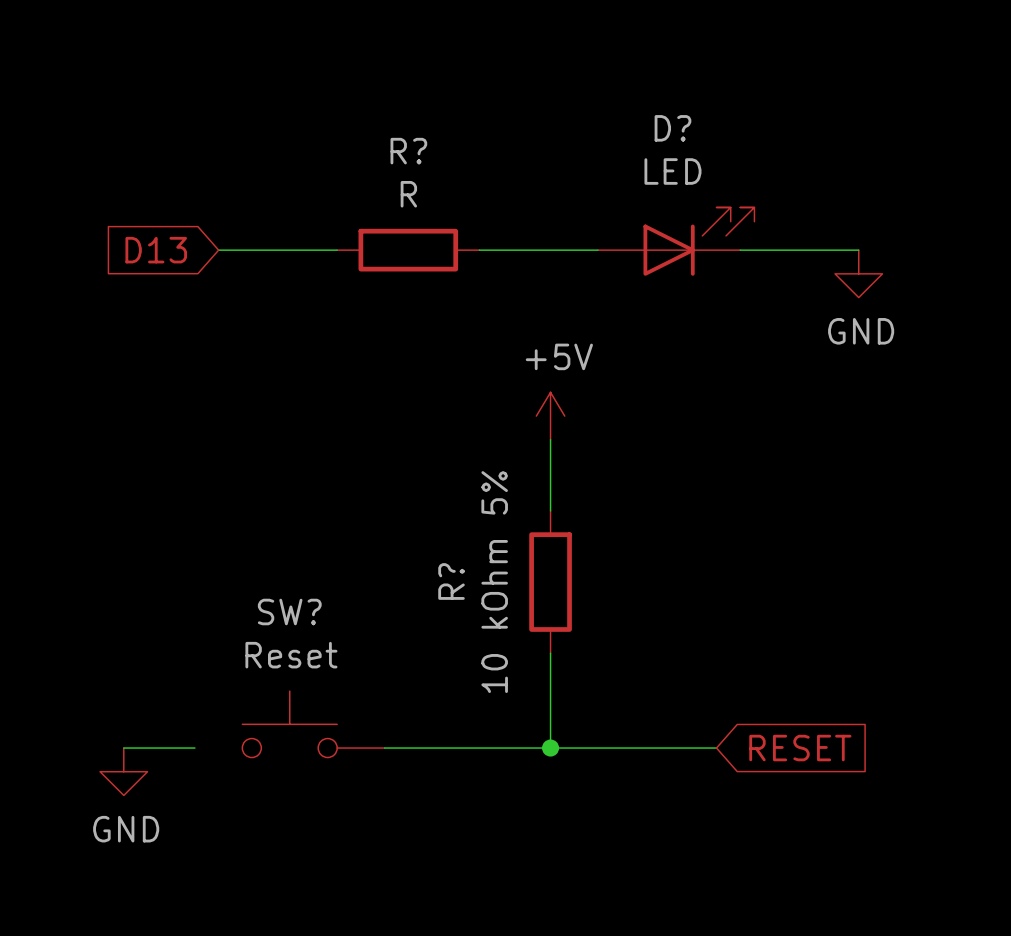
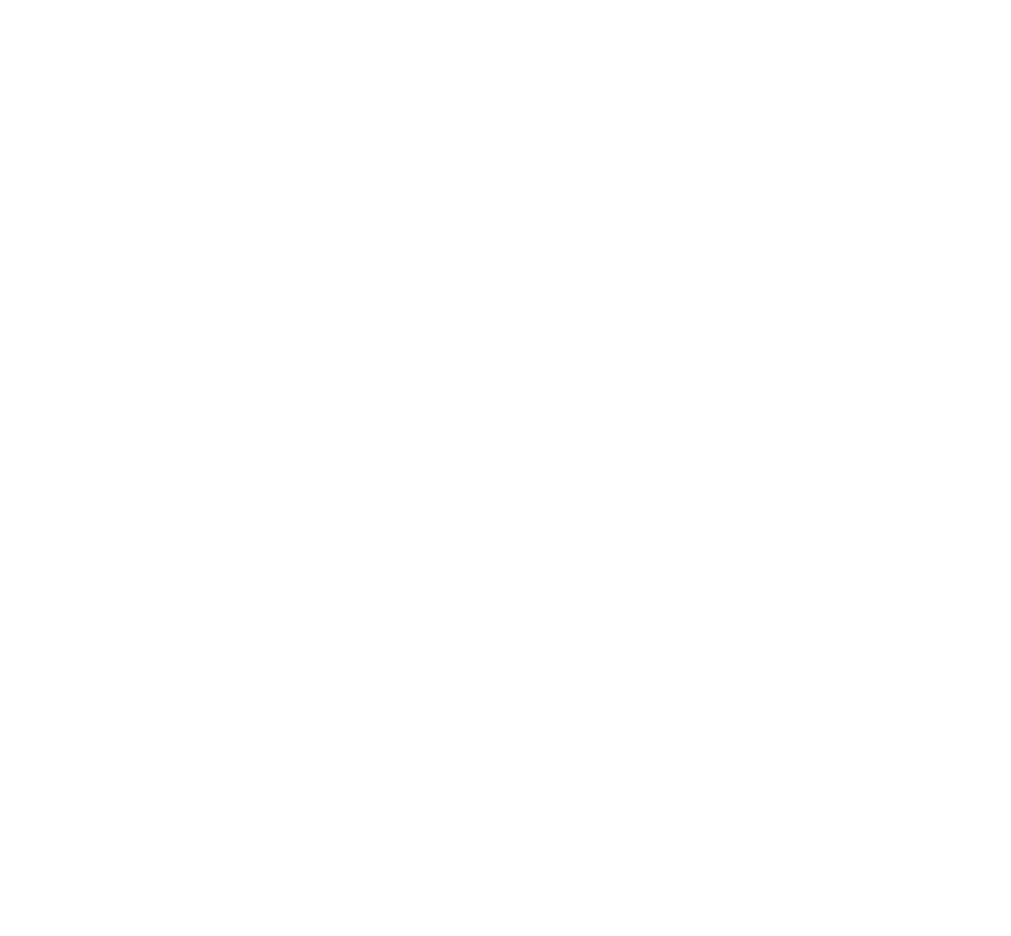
D?: LED (676, 241) -> none
global label: D13 (156, 250) -> none
wire: (218, 250) (337, 250) -> none
R?: R (408, 250) -> none
wire: (479, 250) (597, 250) -> none
wire: (740, 250) (858, 250) -> none
power symbol: GND (858, 273) -> none
power symbol: +5V (550, 416) -> none
wire: (550, 439) (550, 510) -> none
R?: 10 kOhm 5% (550, 582) -> none
wire: (550, 653) (550, 748) -> none
SW?: Reset (313, 724) -> none
wire: (123, 748) (194, 748) -> none
wire: (384, 748) (716, 748) -> none
junction: (550, 748) -> none
global label: RESET (800, 748) -> none
power symbol: GND (123, 771) -> none

